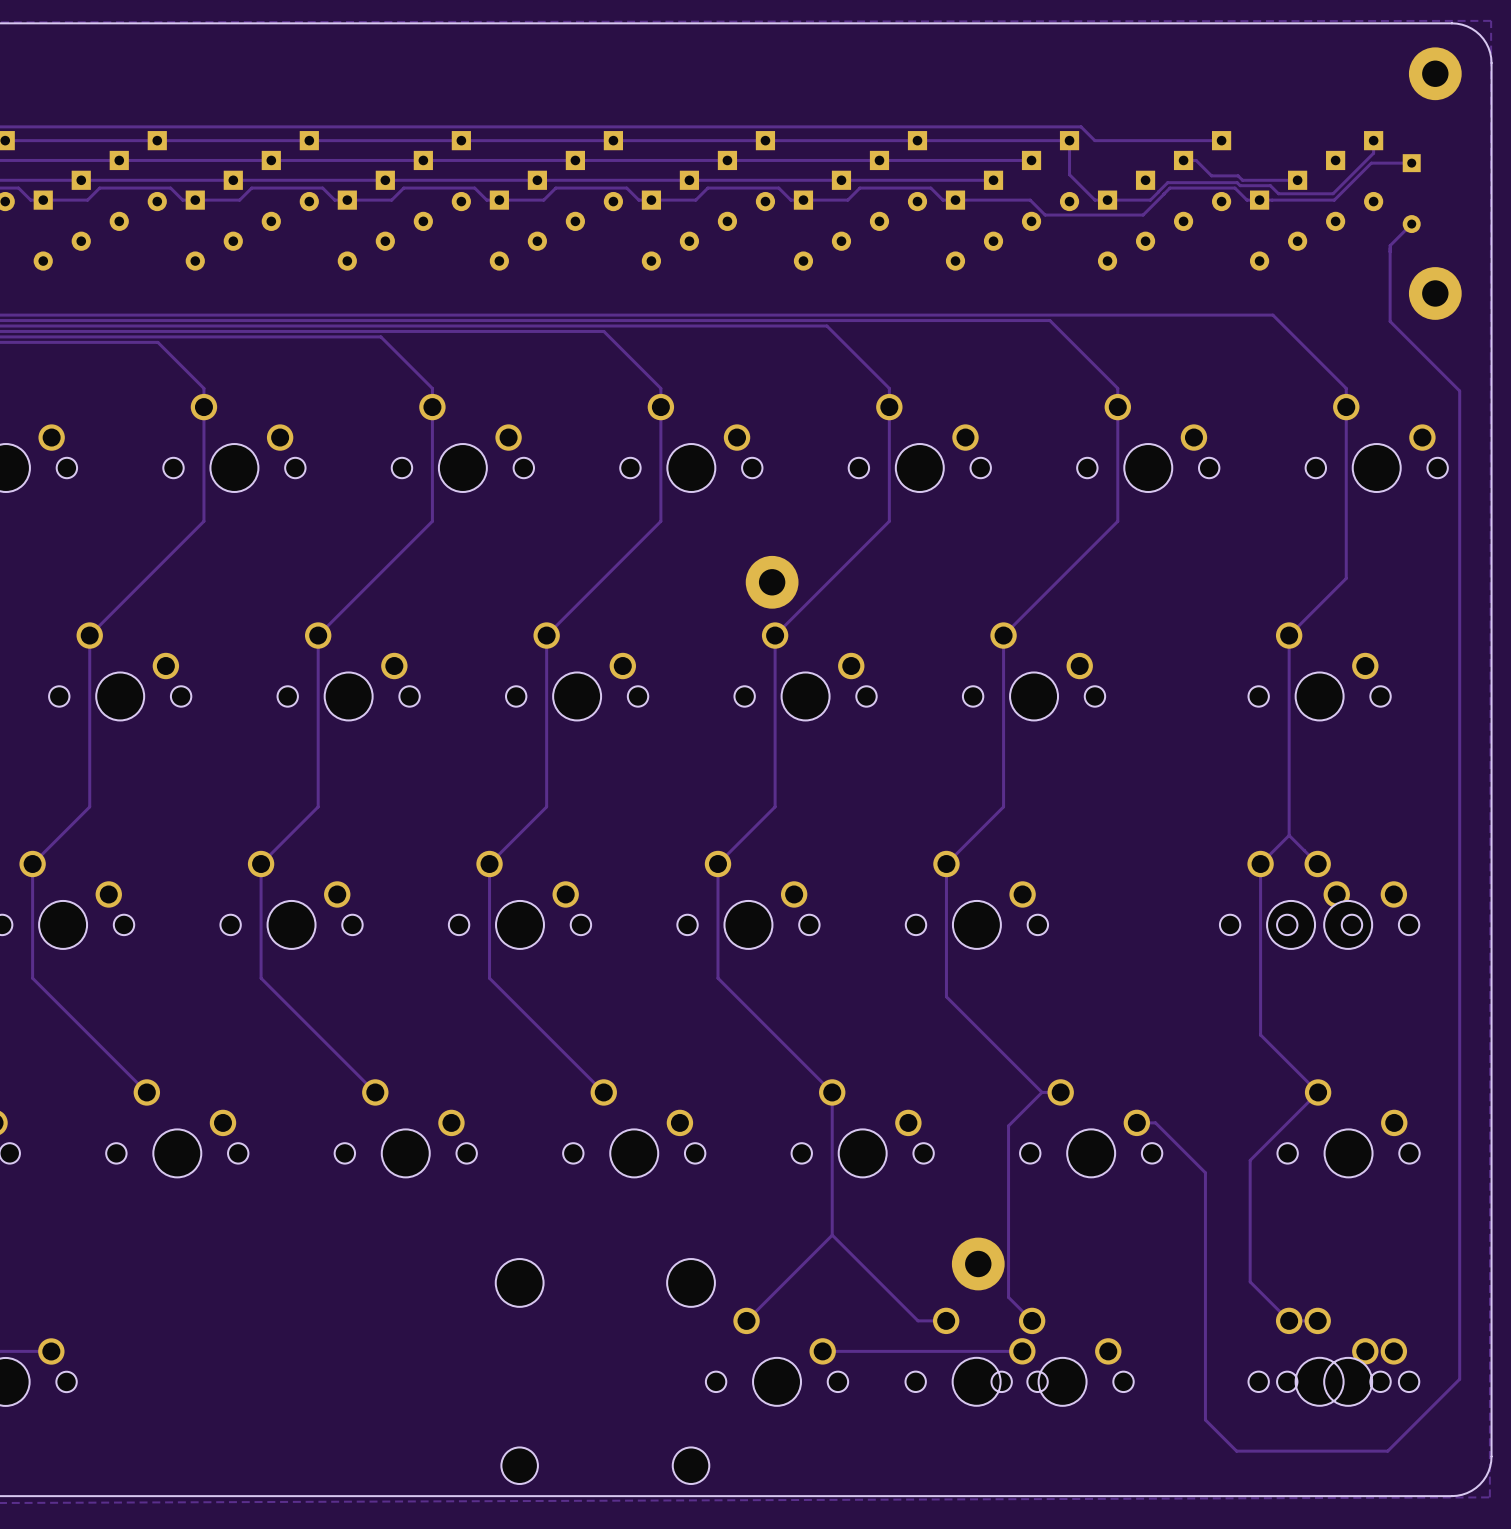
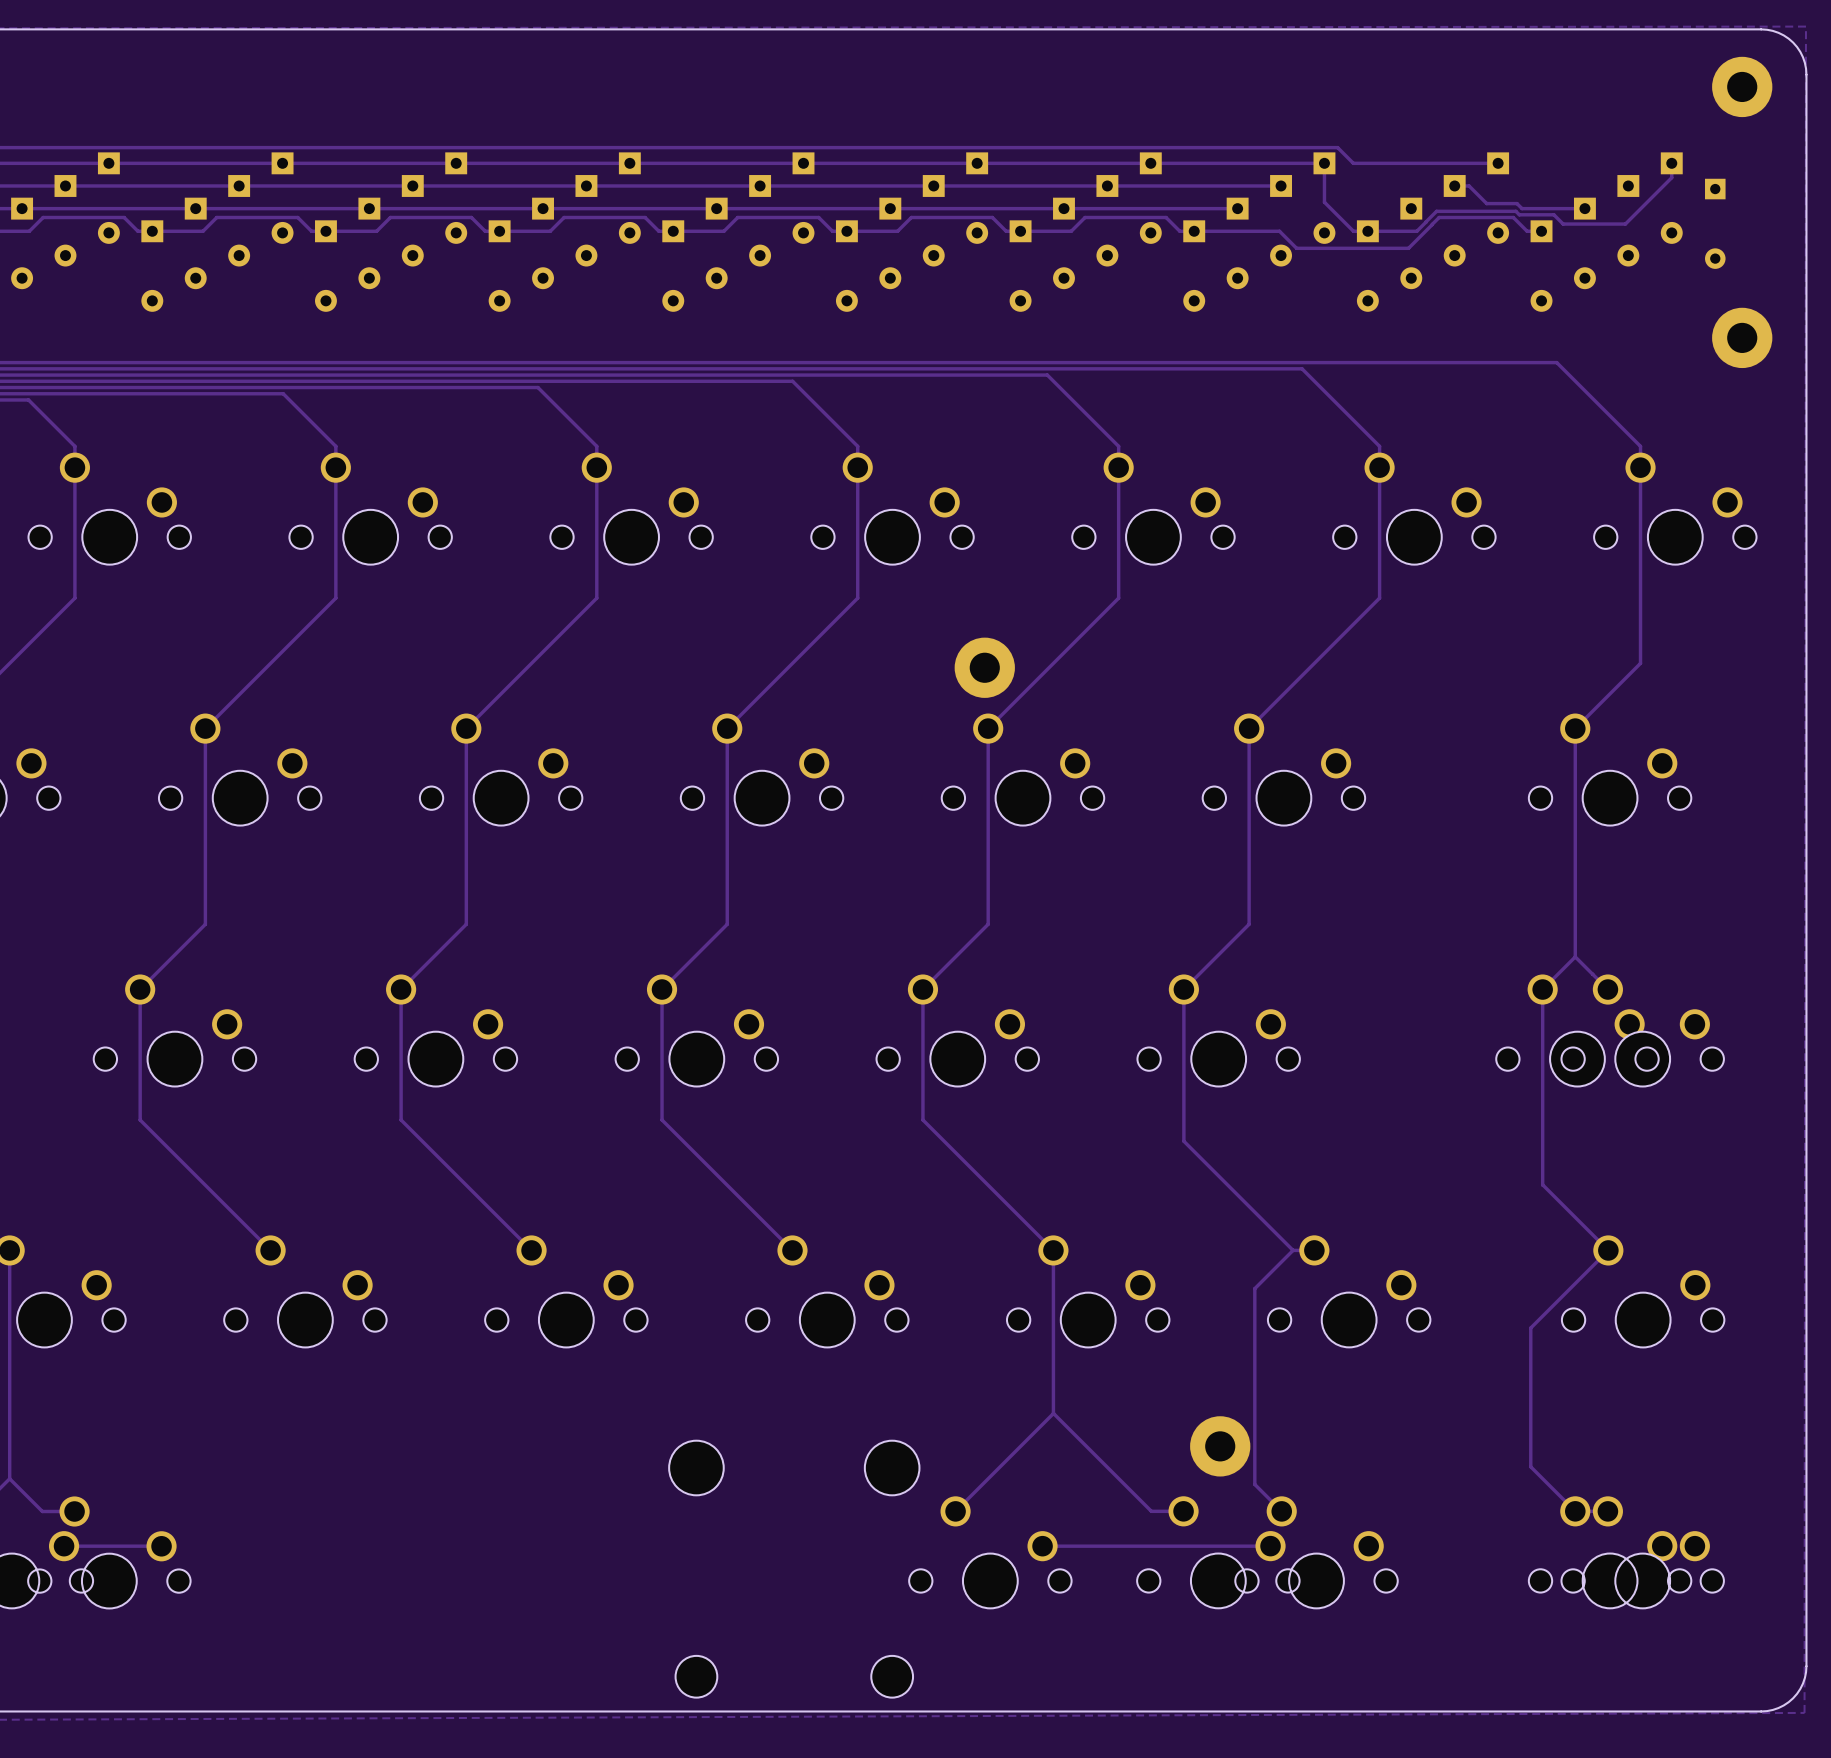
track: (1411, 163) (1371, 163) (1334, 200) (1259, 200) -> none
track: (1411, 224) (1390, 245) (1390, 321) (1459, 391) (1459, 1379) (1387, 1451) (1236, 1451) (1205, 1419) (1205, 1172) (1155, 1122) (1136, 1122) -> none

